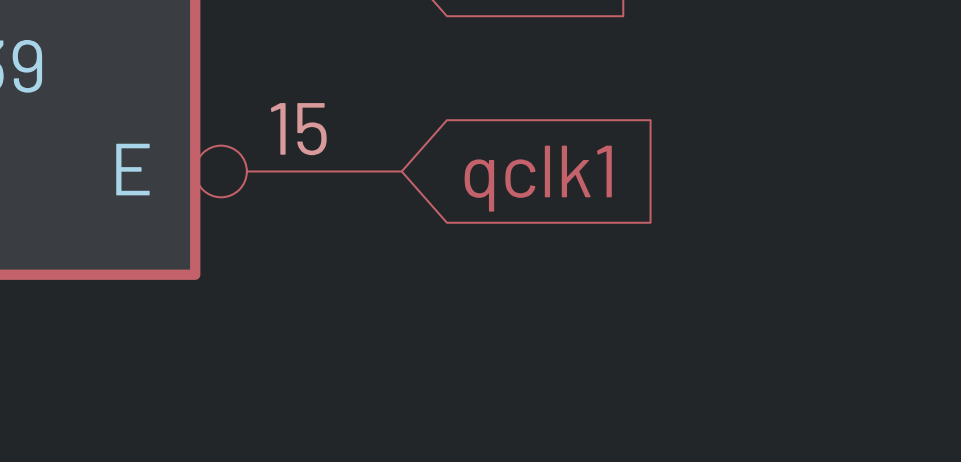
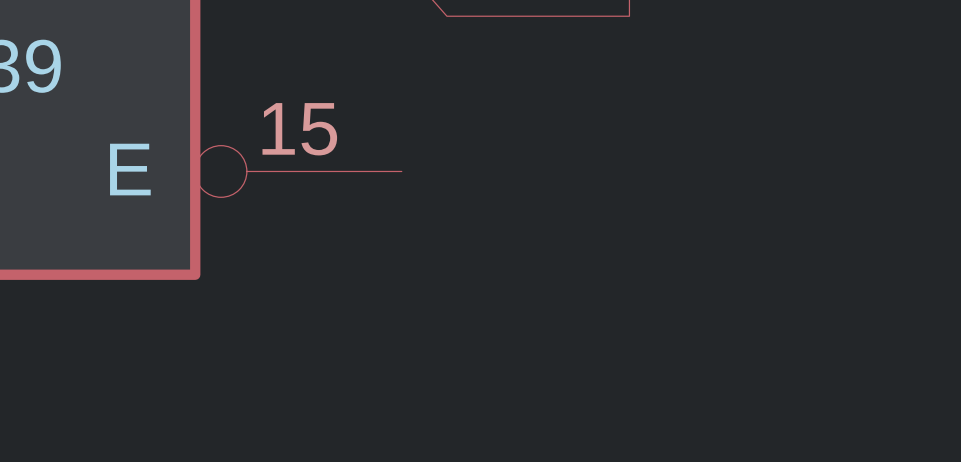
global label: qclk1 (538, 178) -> none

